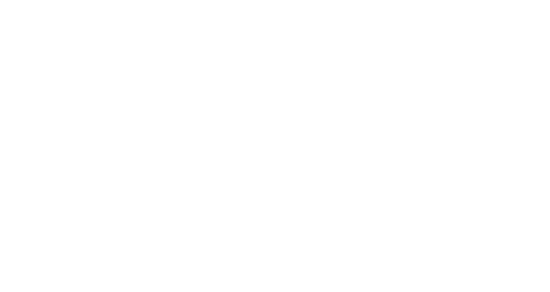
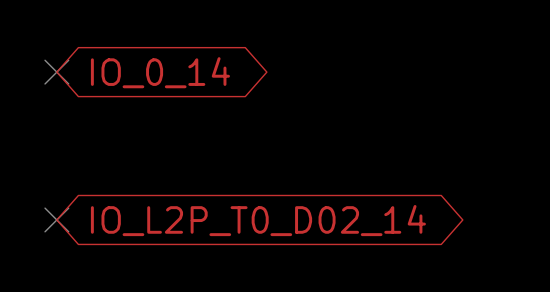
no-connect mark: none -> (56, 72)
global label: none -> IO_0_14 (160, 72)
no-connect mark: none -> (56, 219)
global label: none -> IO_L2P_T0_D02_14 (258, 220)

